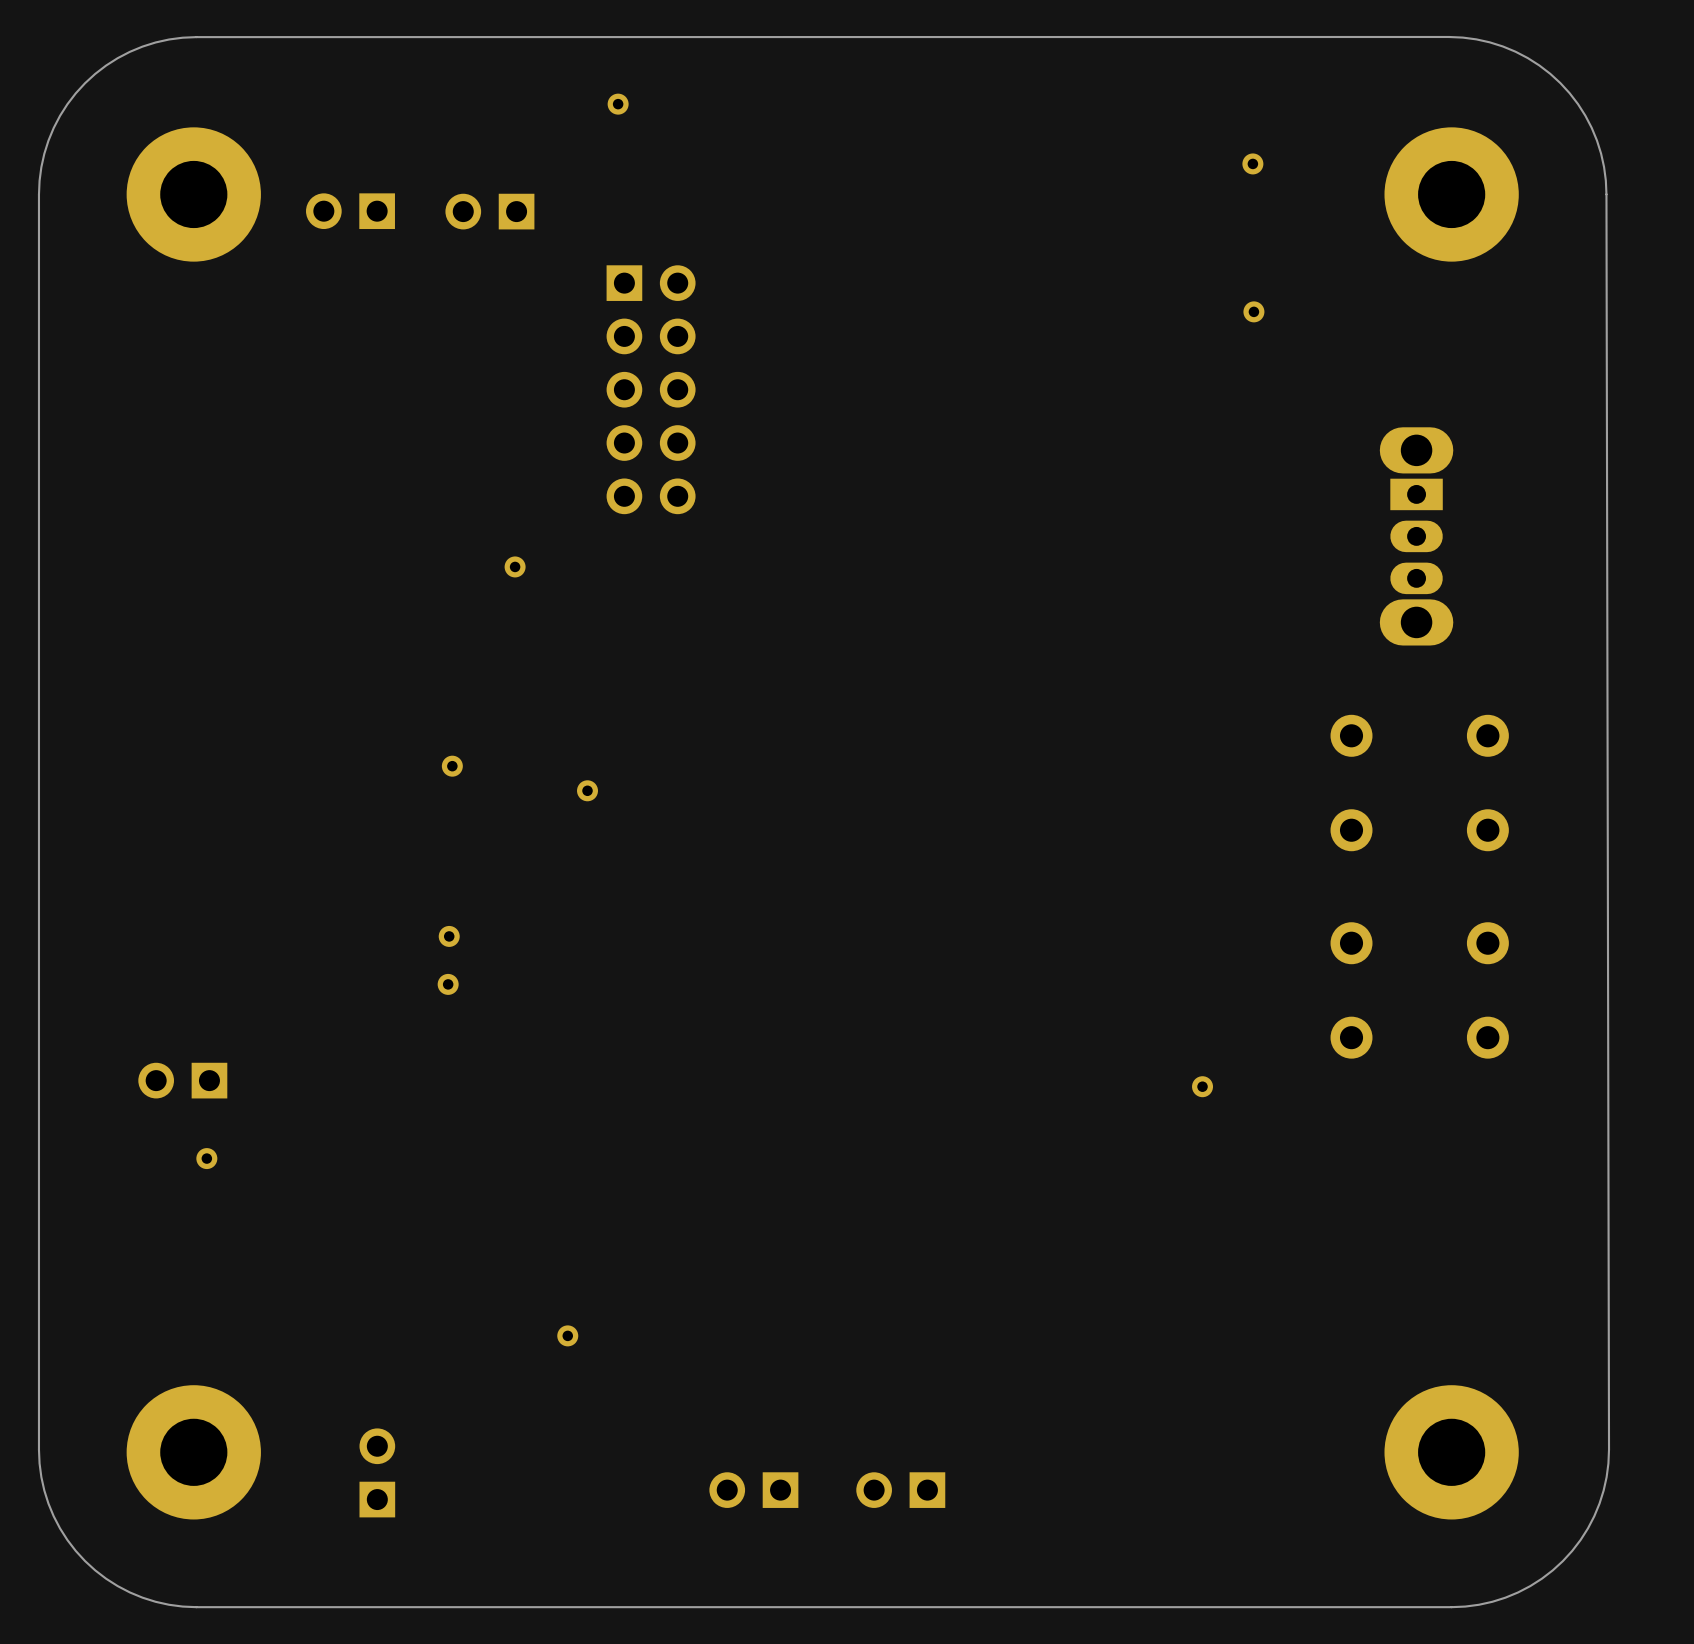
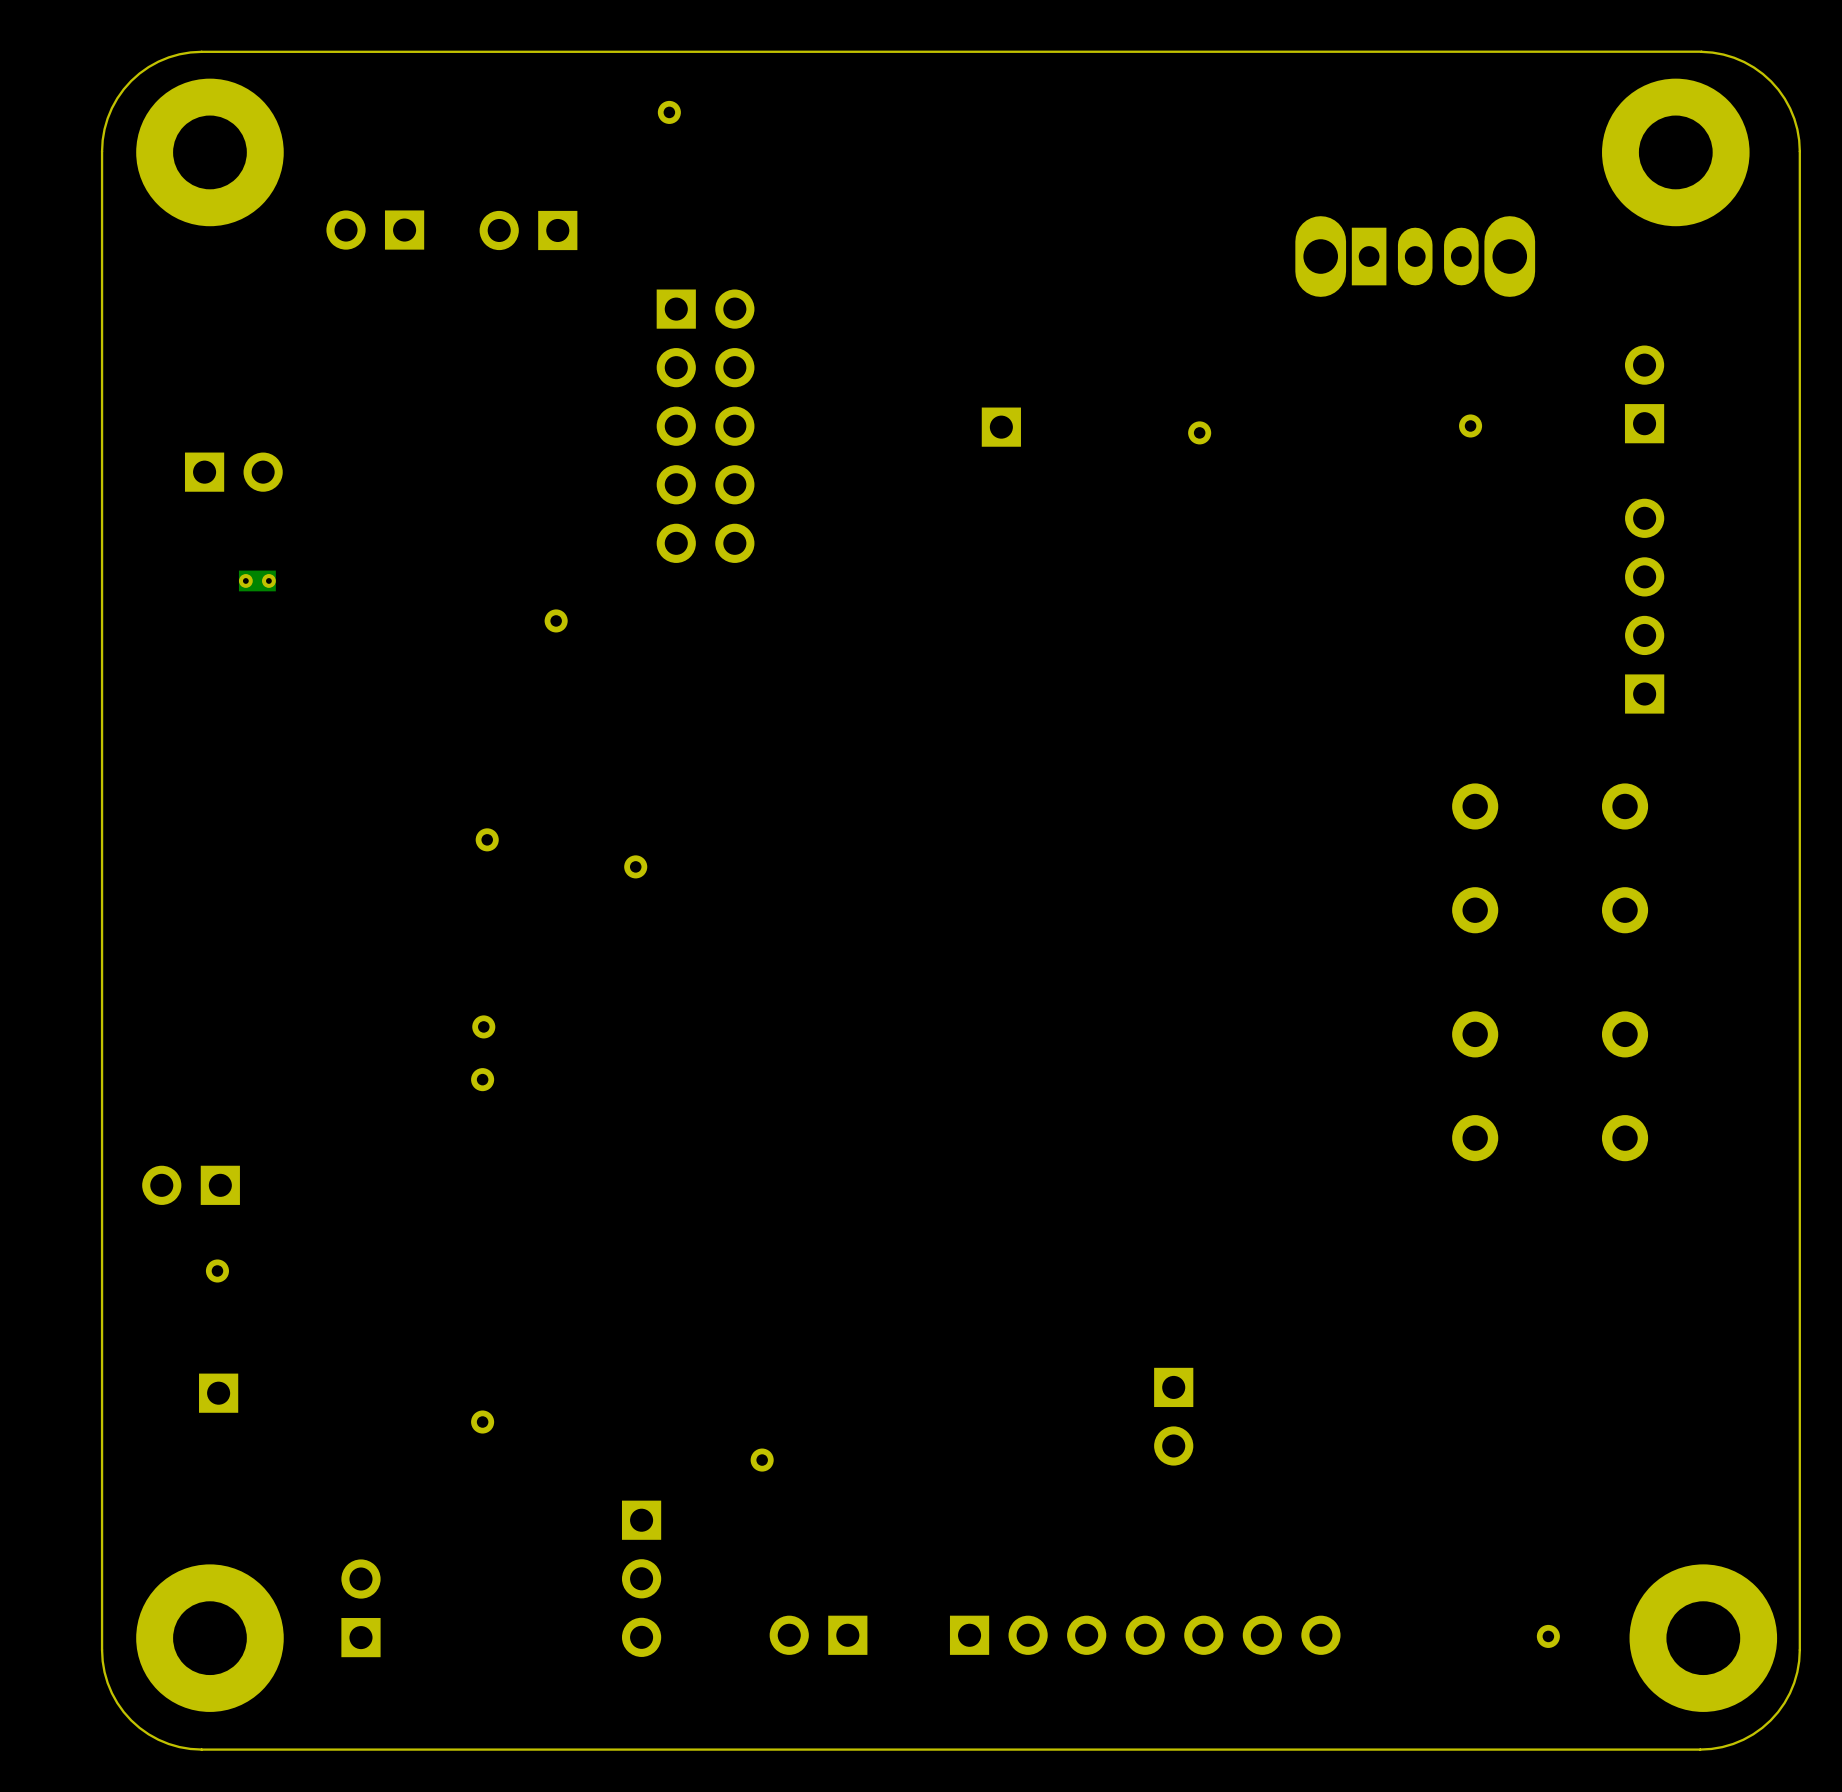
board edge: (1449, 36) (196, 37) (155, 42) (129, 51) (106, 65) (75, 93) (60, 115) (48, 140) (41, 167) (38, 194) (38, 1449) (44, 1490) (53, 1516) (67, 1540) (95, 1570) (117, 1586) (142, 1597) (169, 1604) (196, 1607) (1451, 1607) (1492, 1601) (1518, 1592) (1552, 1570) (1572, 1550) (1587, 1528) (1599, 1503) (1606, 1477) (1609, 1449) (1605, 180) (1596, 140) (1585, 115) (1569, 93) (1550, 73) (1527, 58) (1502, 46) (1476, 39) (1449, 36) -> (1701, 51) (201, 51) (168, 57) (148, 67) (131, 80) (117, 98) (107, 118) (102, 151) (102, 1650) (104, 1672) (111, 1693) (131, 1720) (148, 1734) (168, 1744) (201, 1749) (1700, 1749) (1733, 1744) (1753, 1734) (1770, 1720) (1789, 1693) (1797, 1672) (1799, 1650) (1799, 151) (1794, 118) (1784, 98) (1771, 81) (1753, 67) (1734, 57) (1701, 51)
part: (1252, 163) -> none
part position: (193, 194) -> (209, 152)
part position: (1451, 194) -> (1675, 152)
part: (1253, 311) -> none
part: none -> (1644, 394)
part: none -> (1470, 425)
part: none -> (1001, 427)
part: none -> (1199, 432)
part: none -> (233, 472)
part: none -> (257, 580)
part rotation: 0° (1416, 536) -> 90° counterclockwise (1415, 256)
part position: (1416, 536) -> (1415, 256)
part: none -> (1644, 606)
part: (1202, 1086) -> none
part: none -> (218, 1393)
part: none -> (482, 1422)
part: none -> (762, 1460)
part: (567, 1335) -> none
part: none -> (641, 1578)
part position: (193, 1452) -> (209, 1638)
part position: (1451, 1452) -> (1703, 1638)
part position: (377, 1472) -> (360, 1608)
part rotation: 0° (900, 1490) -> 90° counterclockwise (1173, 1416)
part position: (900, 1490) -> (1173, 1416)
part: none -> (1145, 1635)
part: none -> (1548, 1636)

